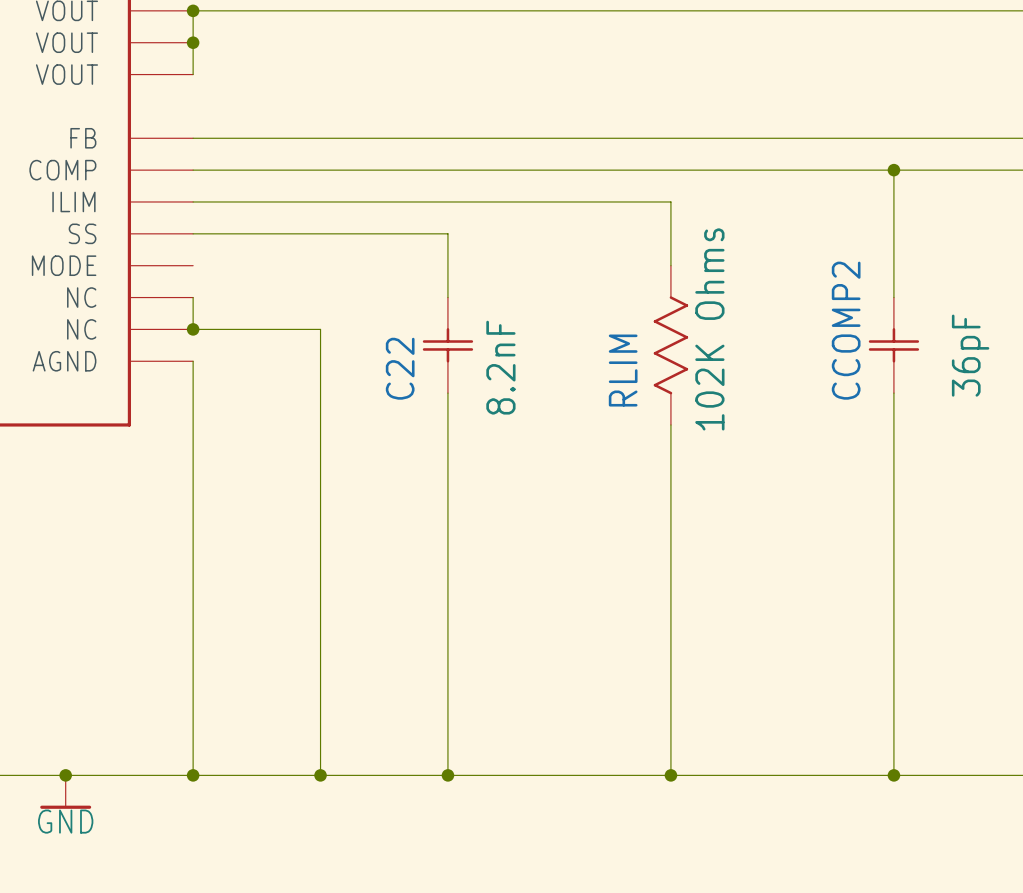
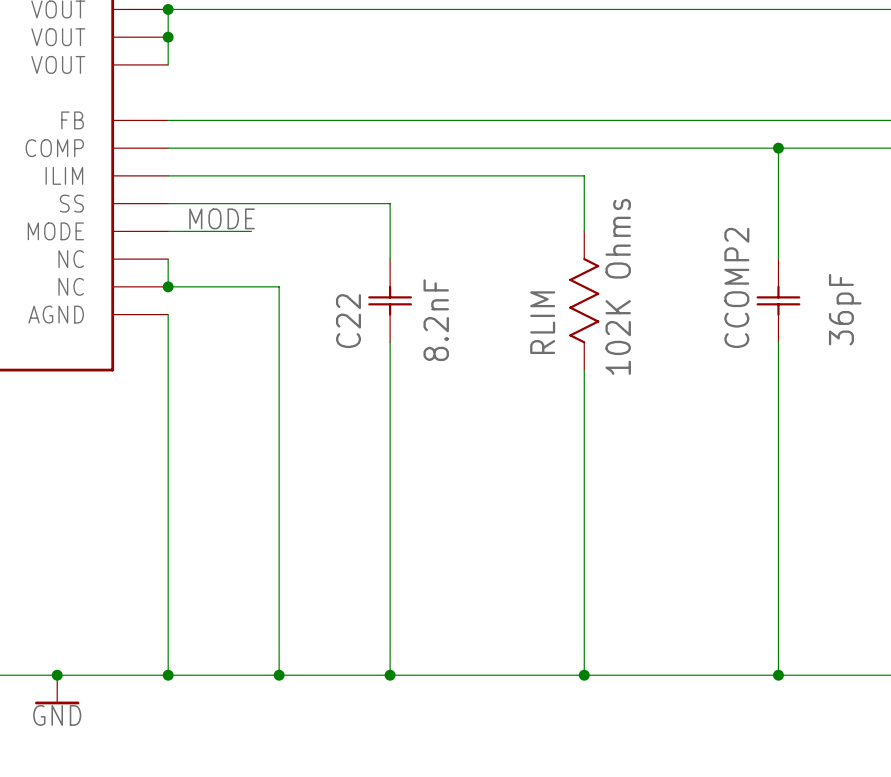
label: none -> MODE (222, 218)
wire: none -> (168, 231) (251, 231)

